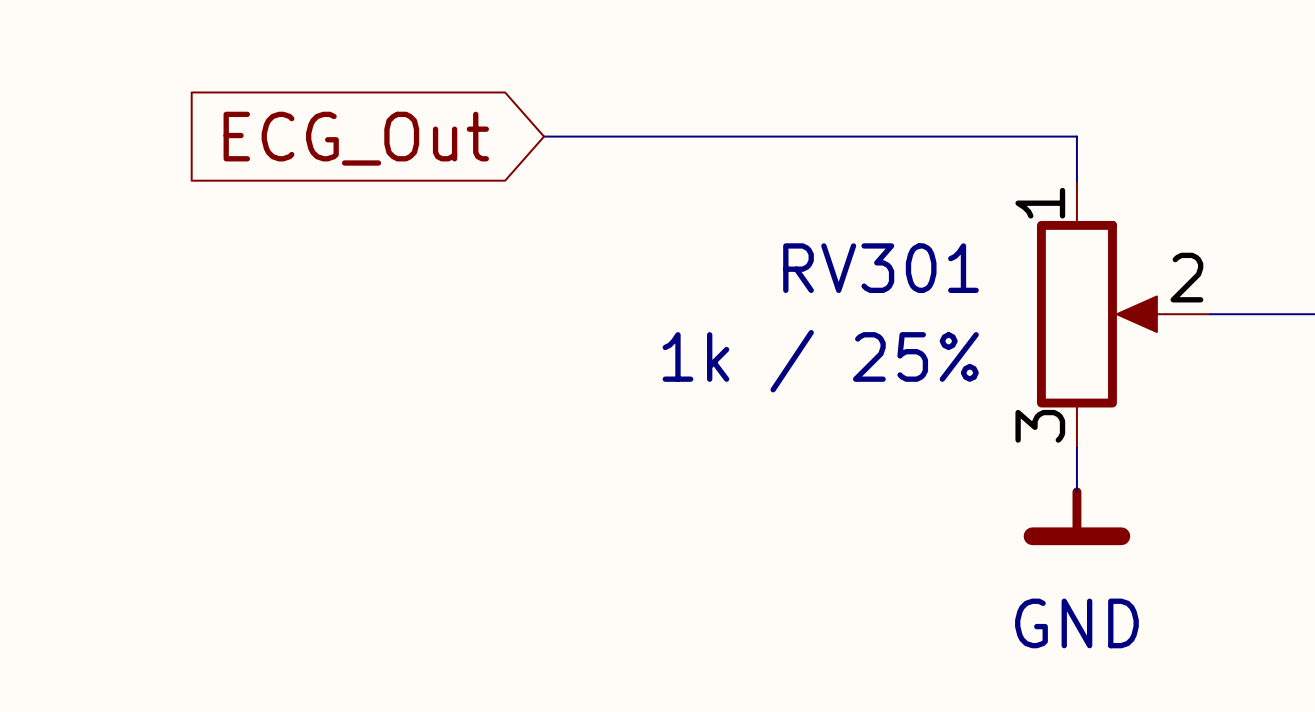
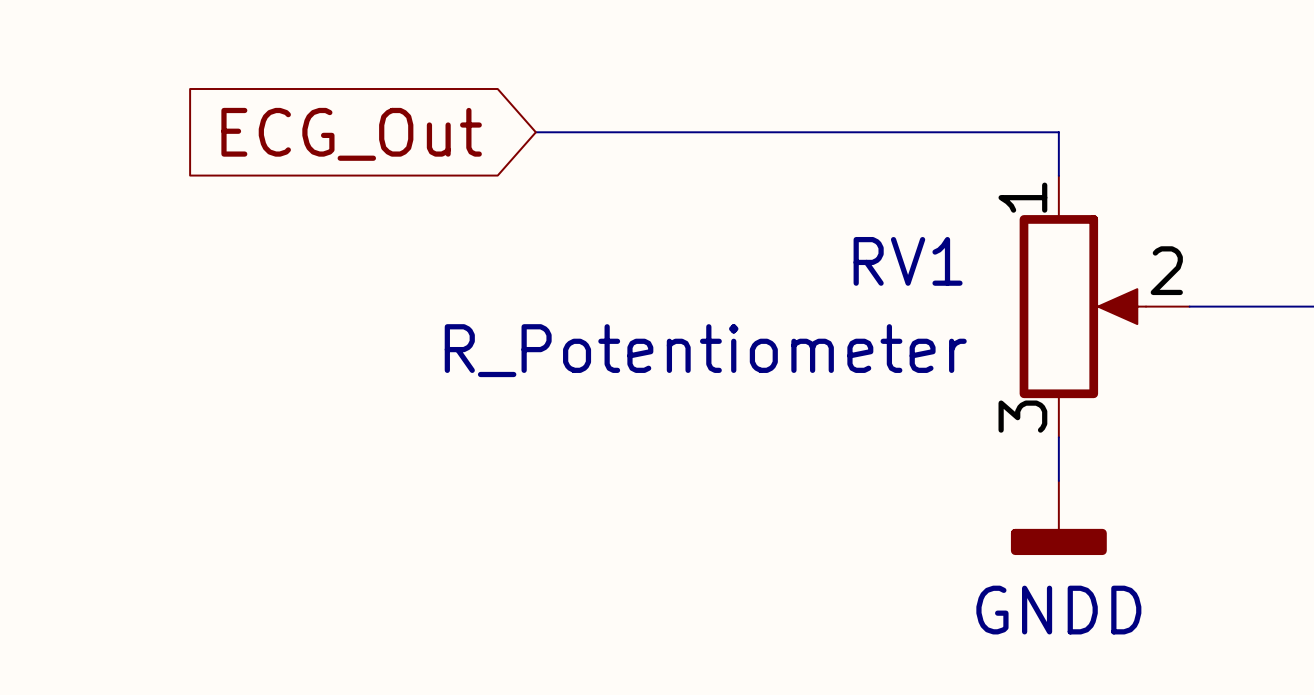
RV301 name: RV301 (880, 268) -> RV1 (908, 261)
RV301 value: 1k / 25% (820, 361) -> R_Potentiometer (705, 350)
power symbol: GND (1076, 516) -> GNDD (1058, 517)

